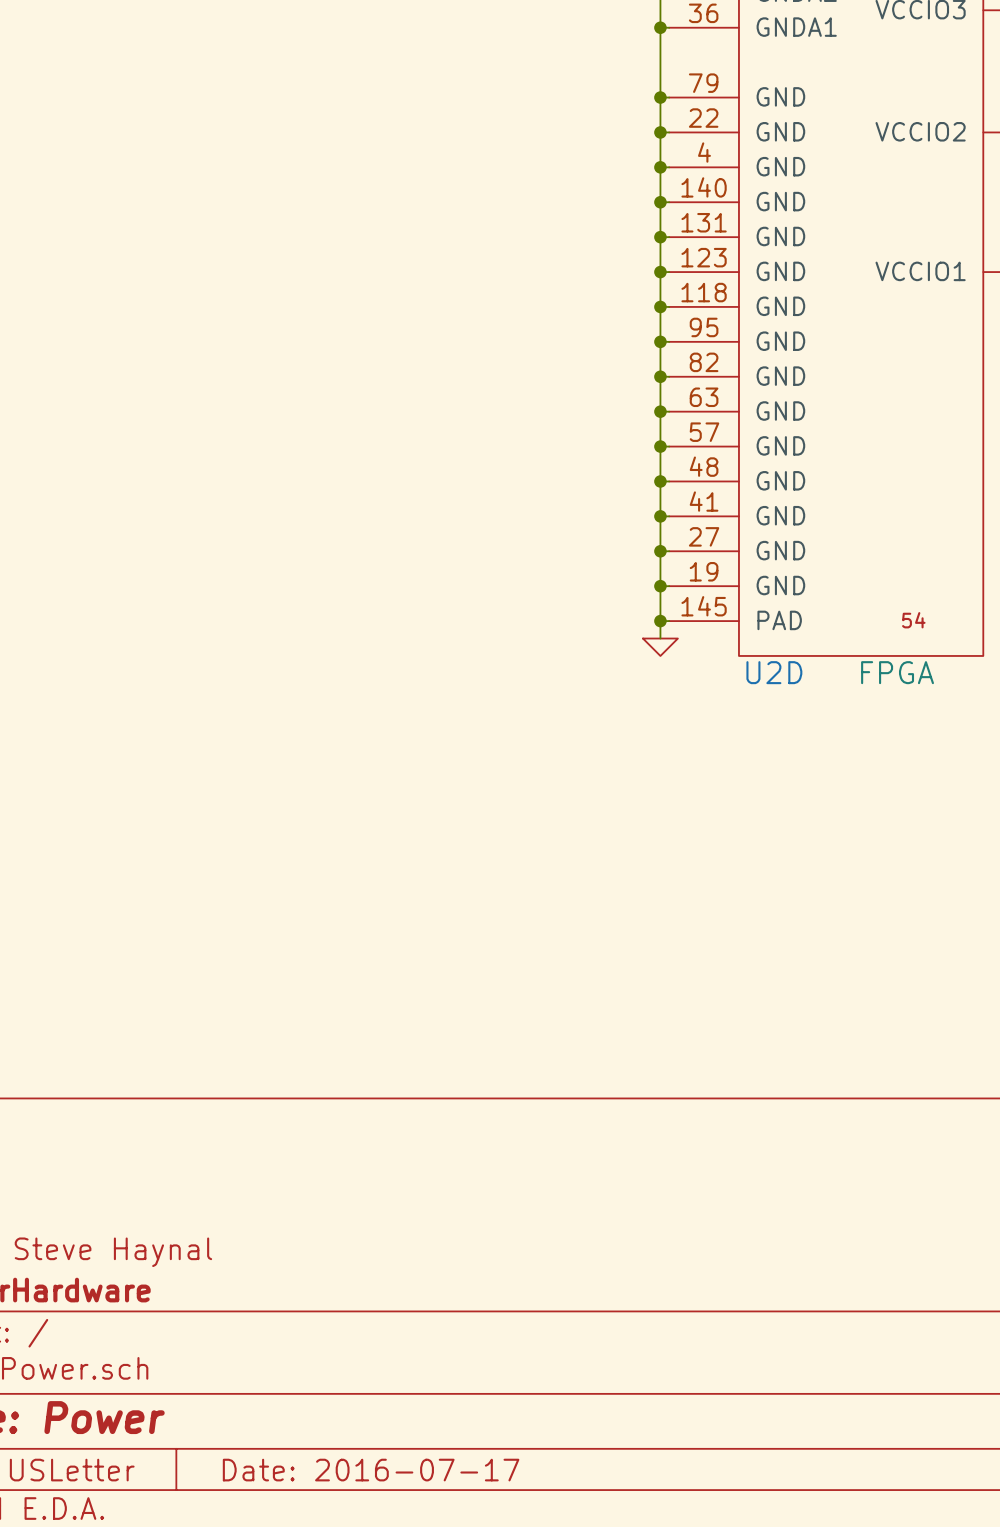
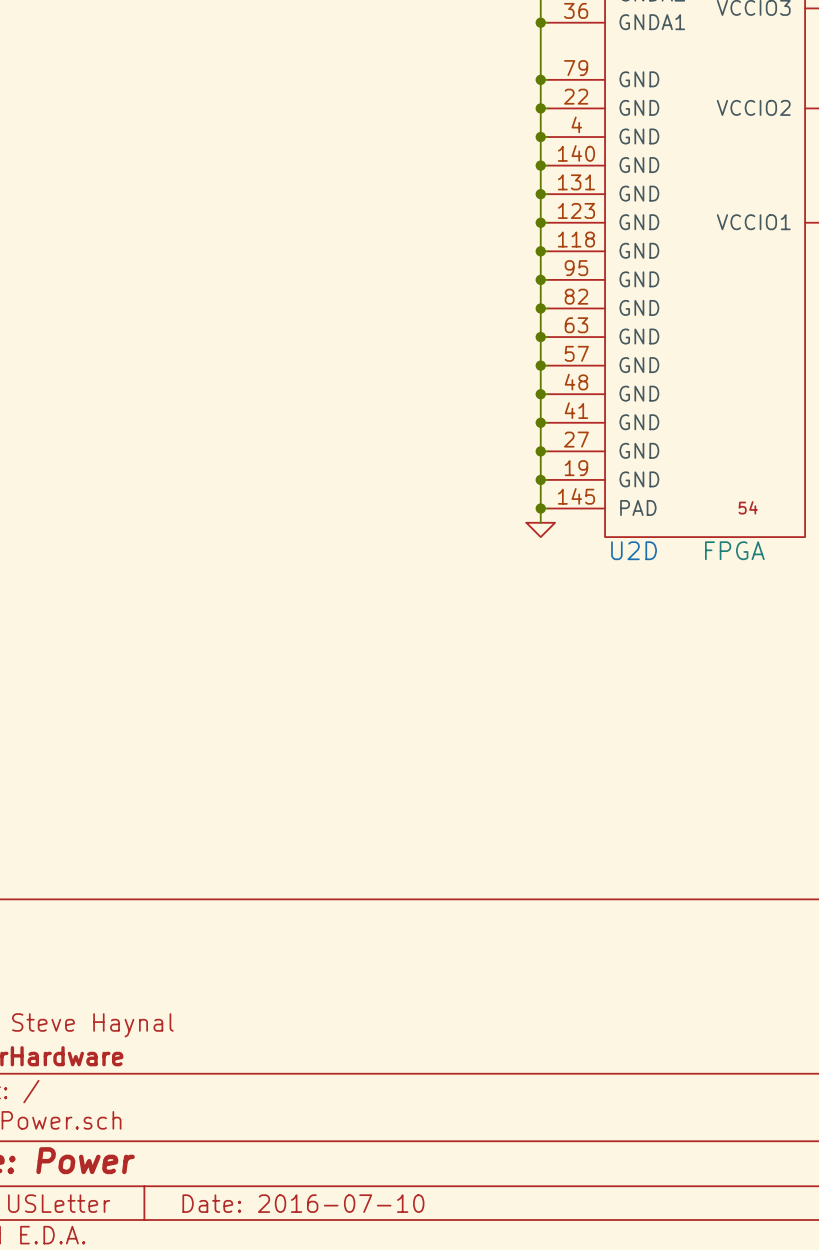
title block: Date: 2016-07-17 (371, 1470) -> Date: 2016-07-10 (303, 1203)

